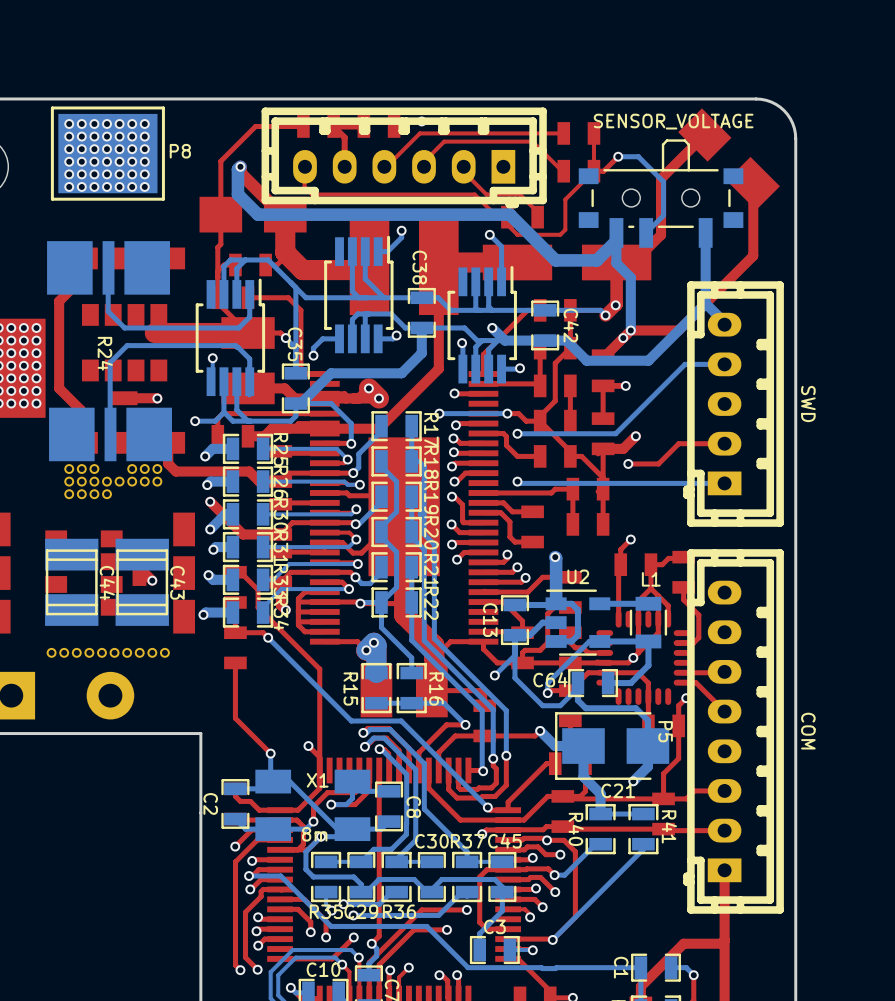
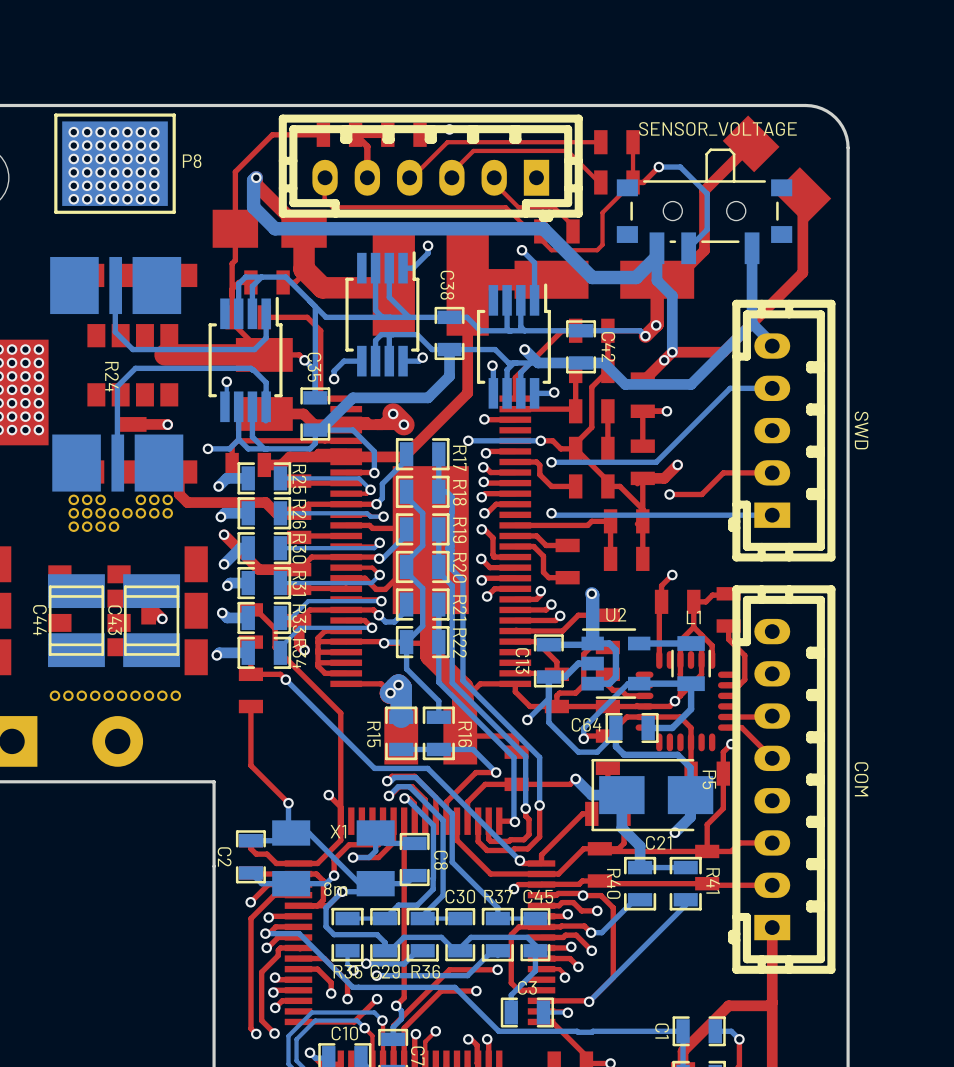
top track: (81, 258) (81, 279) (59, 301) (59, 388) (81, 410) (81, 442) -> none
C43 name position: C43 (177, 582) -> C43 (115, 620)
C44 name position: C44 (107, 583) -> C44 (39, 620)

